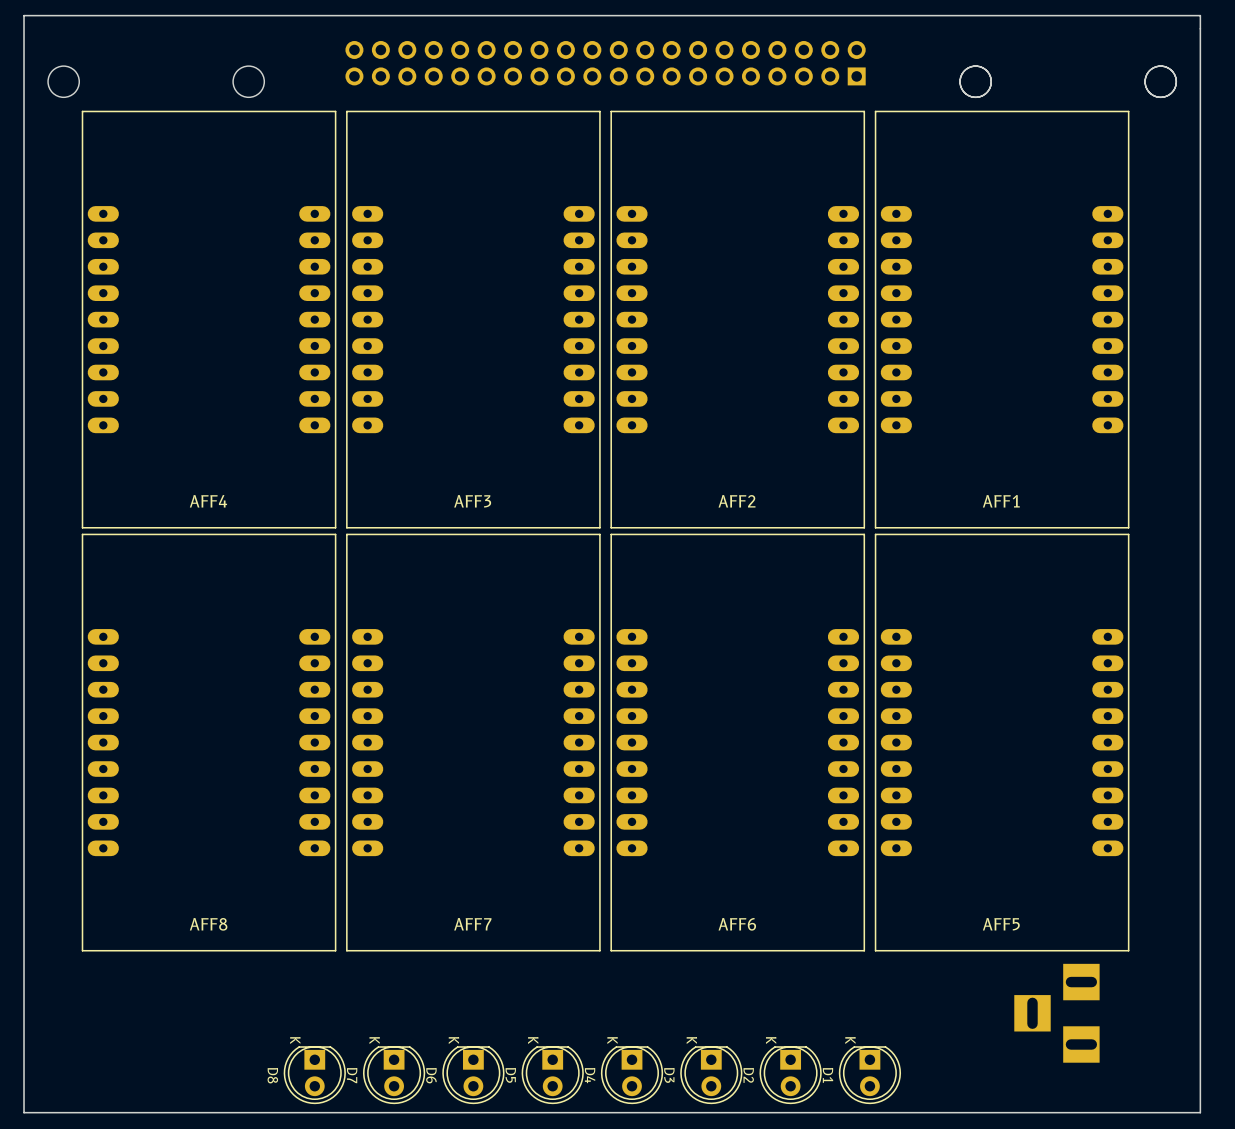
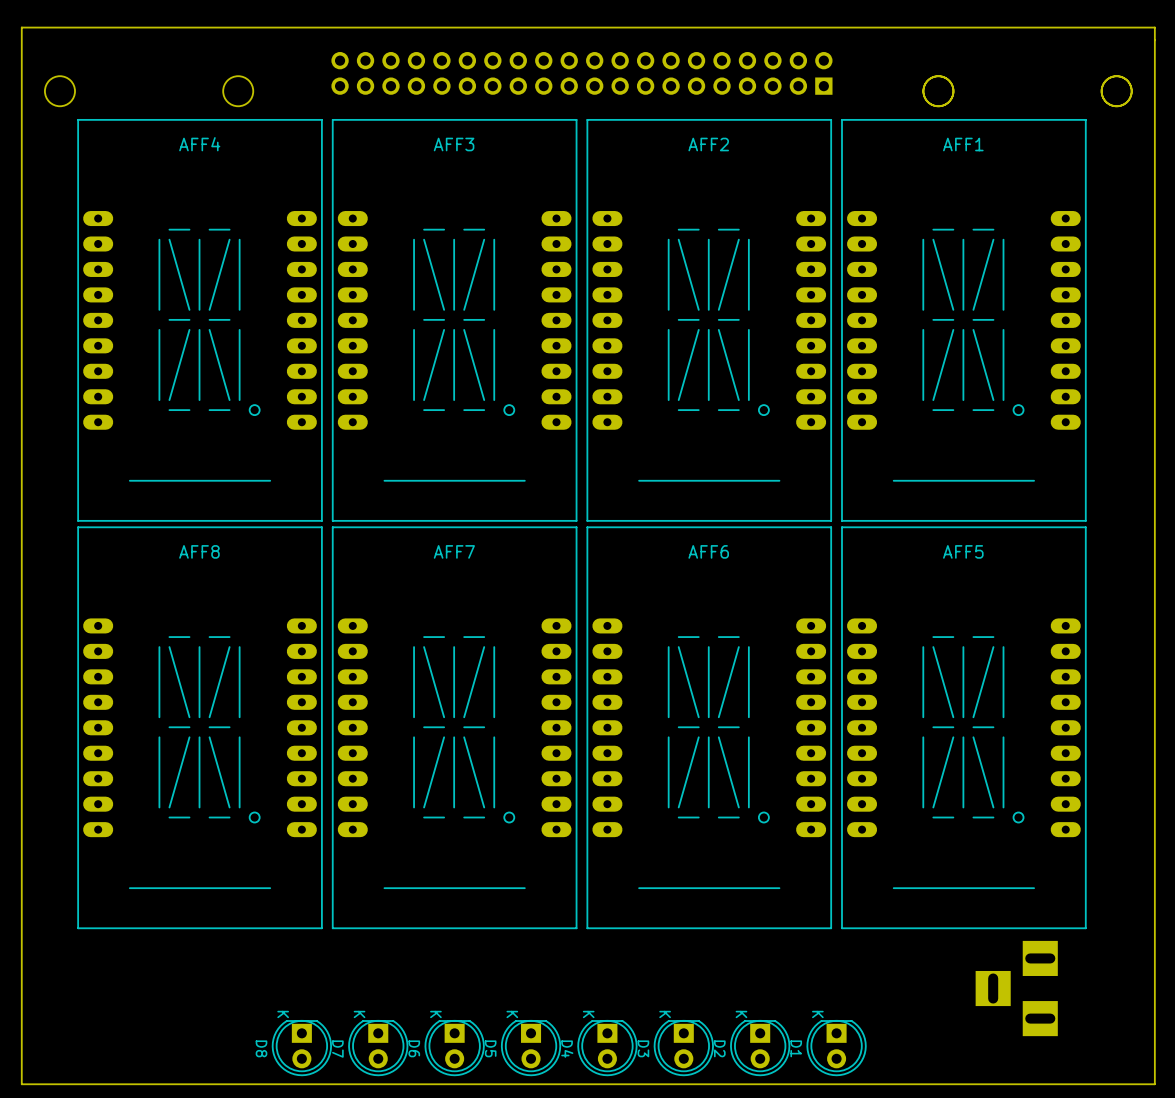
AFF4 footprint: [81, 110, 337, 529] -> [77, 119, 323, 522]
AFF3 footprint: [346, 110, 601, 529] -> [331, 119, 578, 522]
AFF2 footprint: [610, 110, 866, 529] -> [586, 119, 832, 522]
AFF1 footprint: [874, 110, 1130, 529] -> [841, 119, 1087, 522]
AFF4 name position: AFF4 (208, 501) -> AFF4 (199, 144)
AFF3 name position: AFF3 (472, 501) -> AFF3 (454, 144)
AFF2 name position: AFF2 (737, 501) -> AFF2 (708, 144)
AFF1 name position: AFF1 (1001, 501) -> AFF1 (963, 144)
AFF8 footprint: [81, 533, 337, 952] -> [77, 526, 323, 930]
AFF7 footprint: [346, 533, 601, 952] -> [331, 526, 578, 930]
AFF6 footprint: [610, 533, 866, 952] -> [586, 526, 832, 930]
AFF5 footprint: [874, 533, 1130, 952] -> [841, 526, 1087, 930]
AFF8 name position: AFF8 (208, 924) -> AFF8 (199, 551)
AFF7 name position: AFF7 (472, 924) -> AFF7 (454, 551)
AFF6 name position: AFF6 (737, 924) -> AFF6 (708, 551)
AFF5 name position: AFF5 (1001, 924) -> AFF5 (963, 551)

